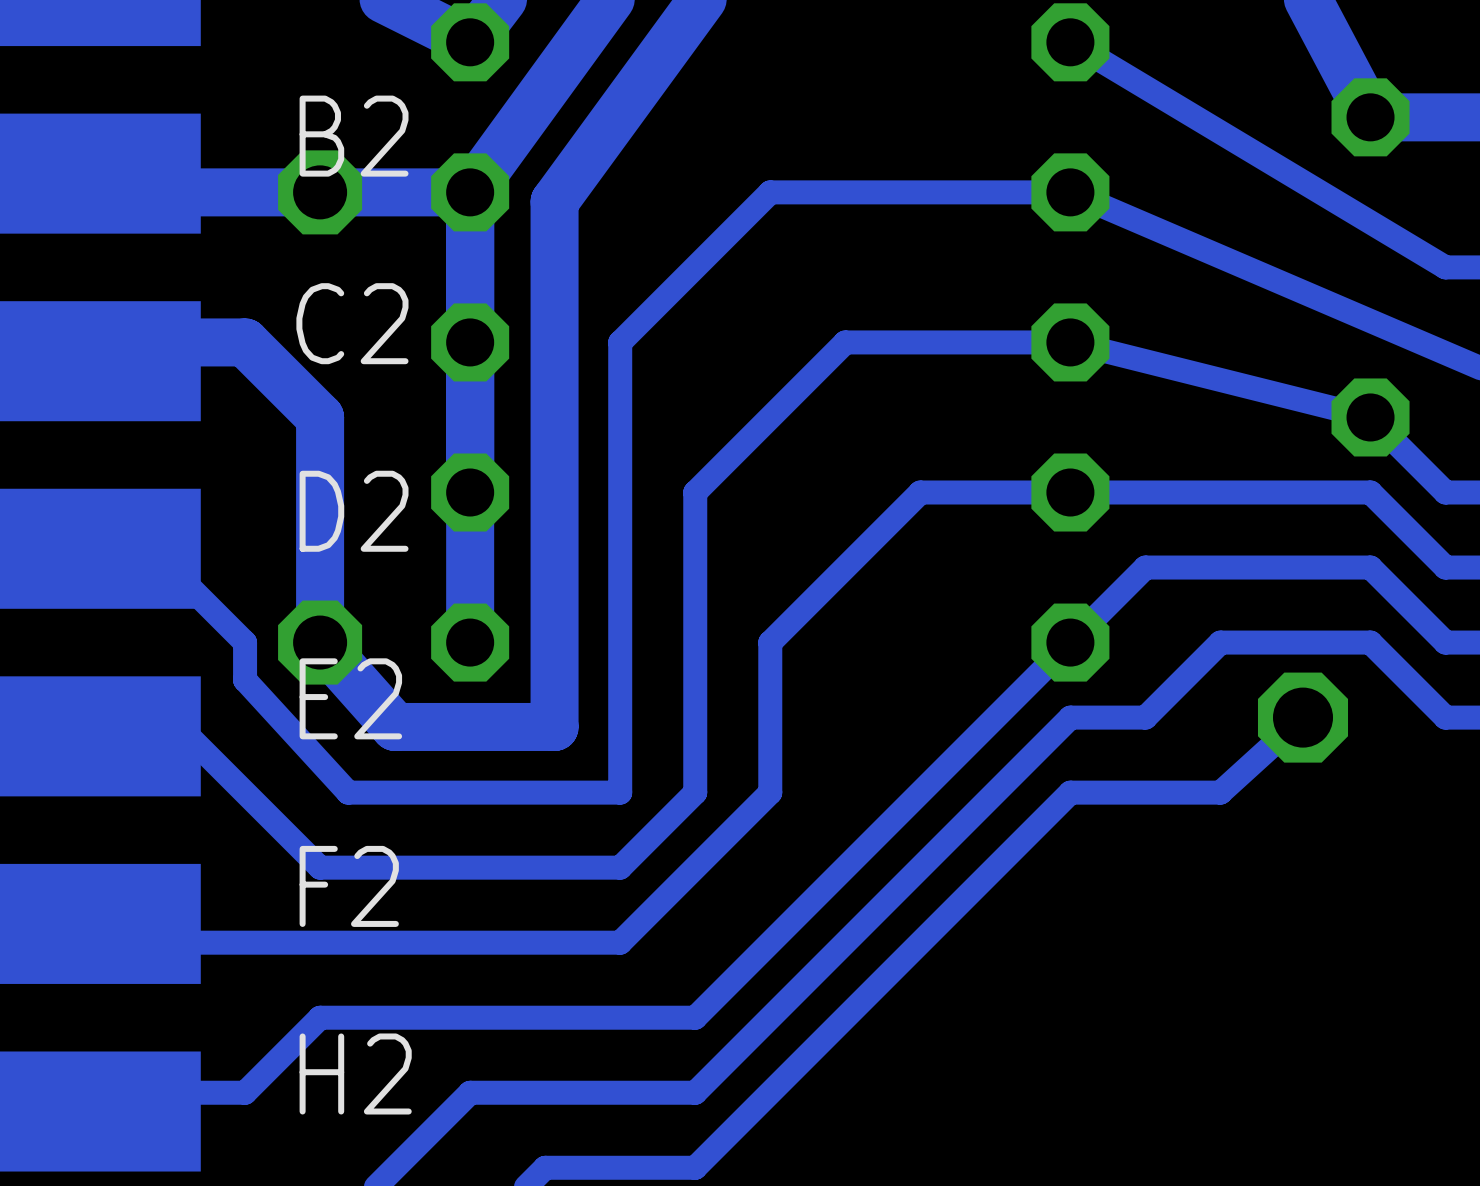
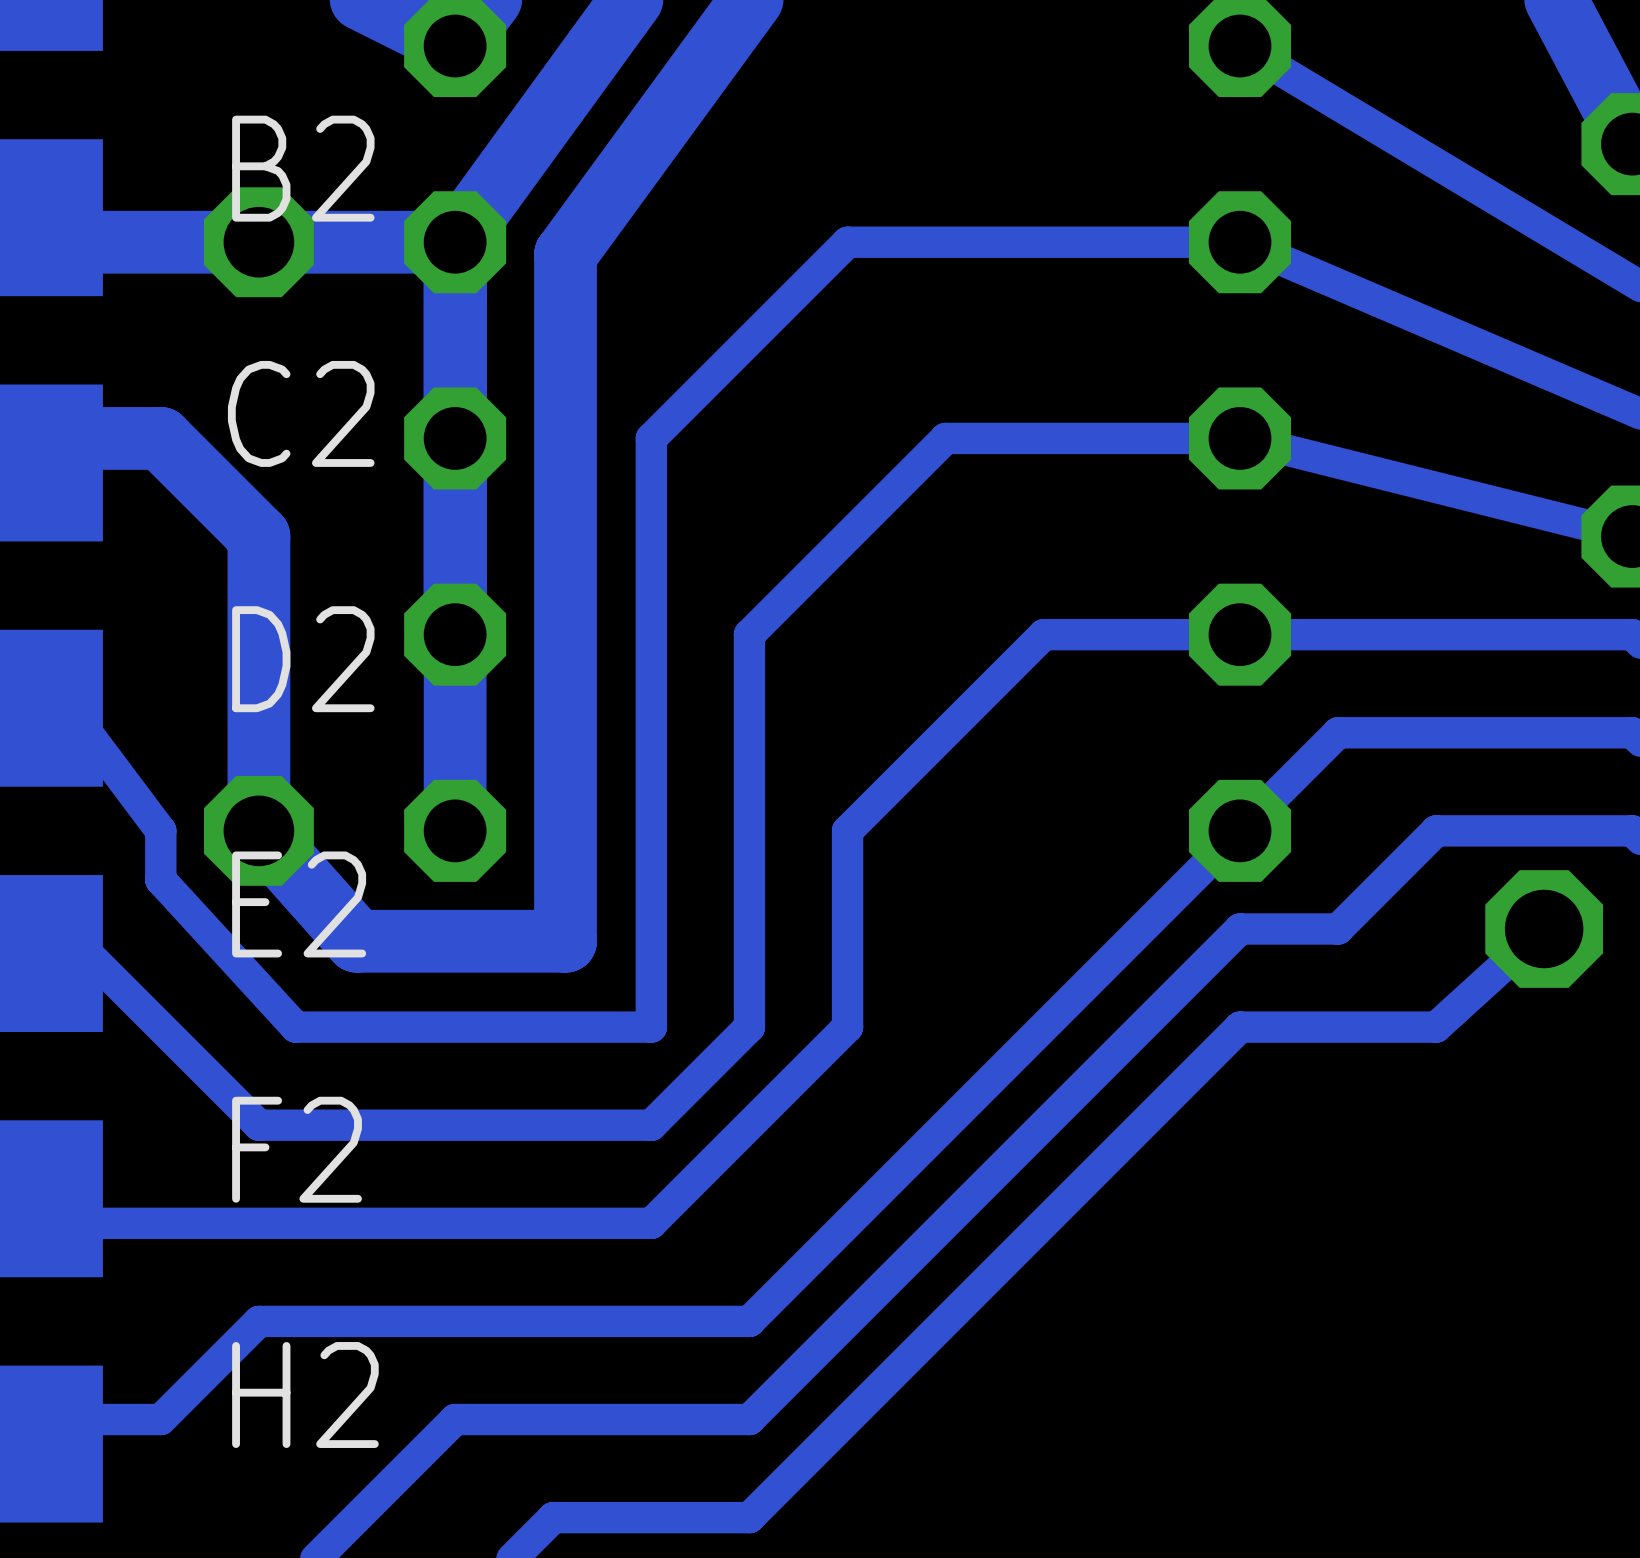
bottom track: (170, 567) (245, 642) -> (62, 732) (87, 732) (160, 830)

